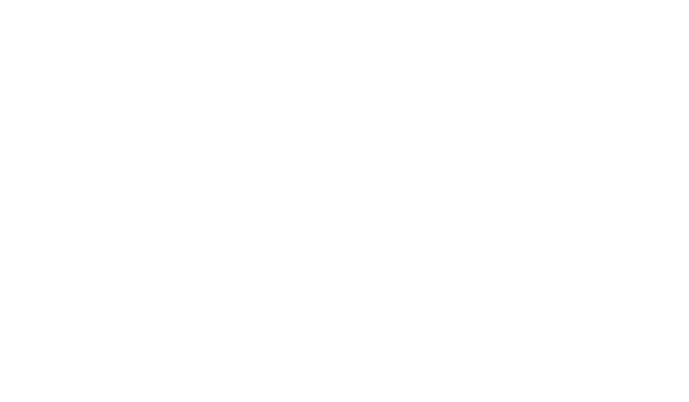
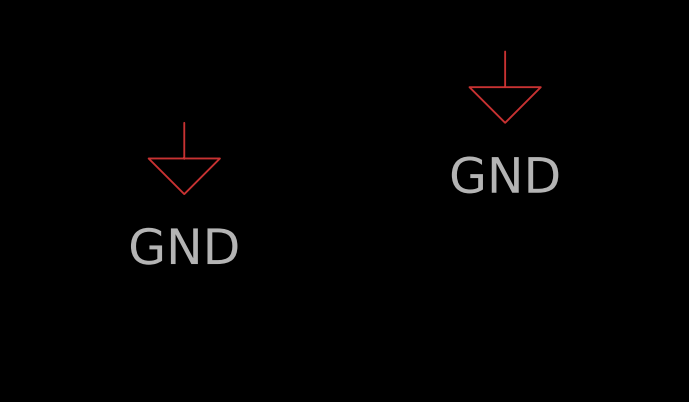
power symbol: none -> GND (505, 87)
power symbol: none -> GND (184, 158)

